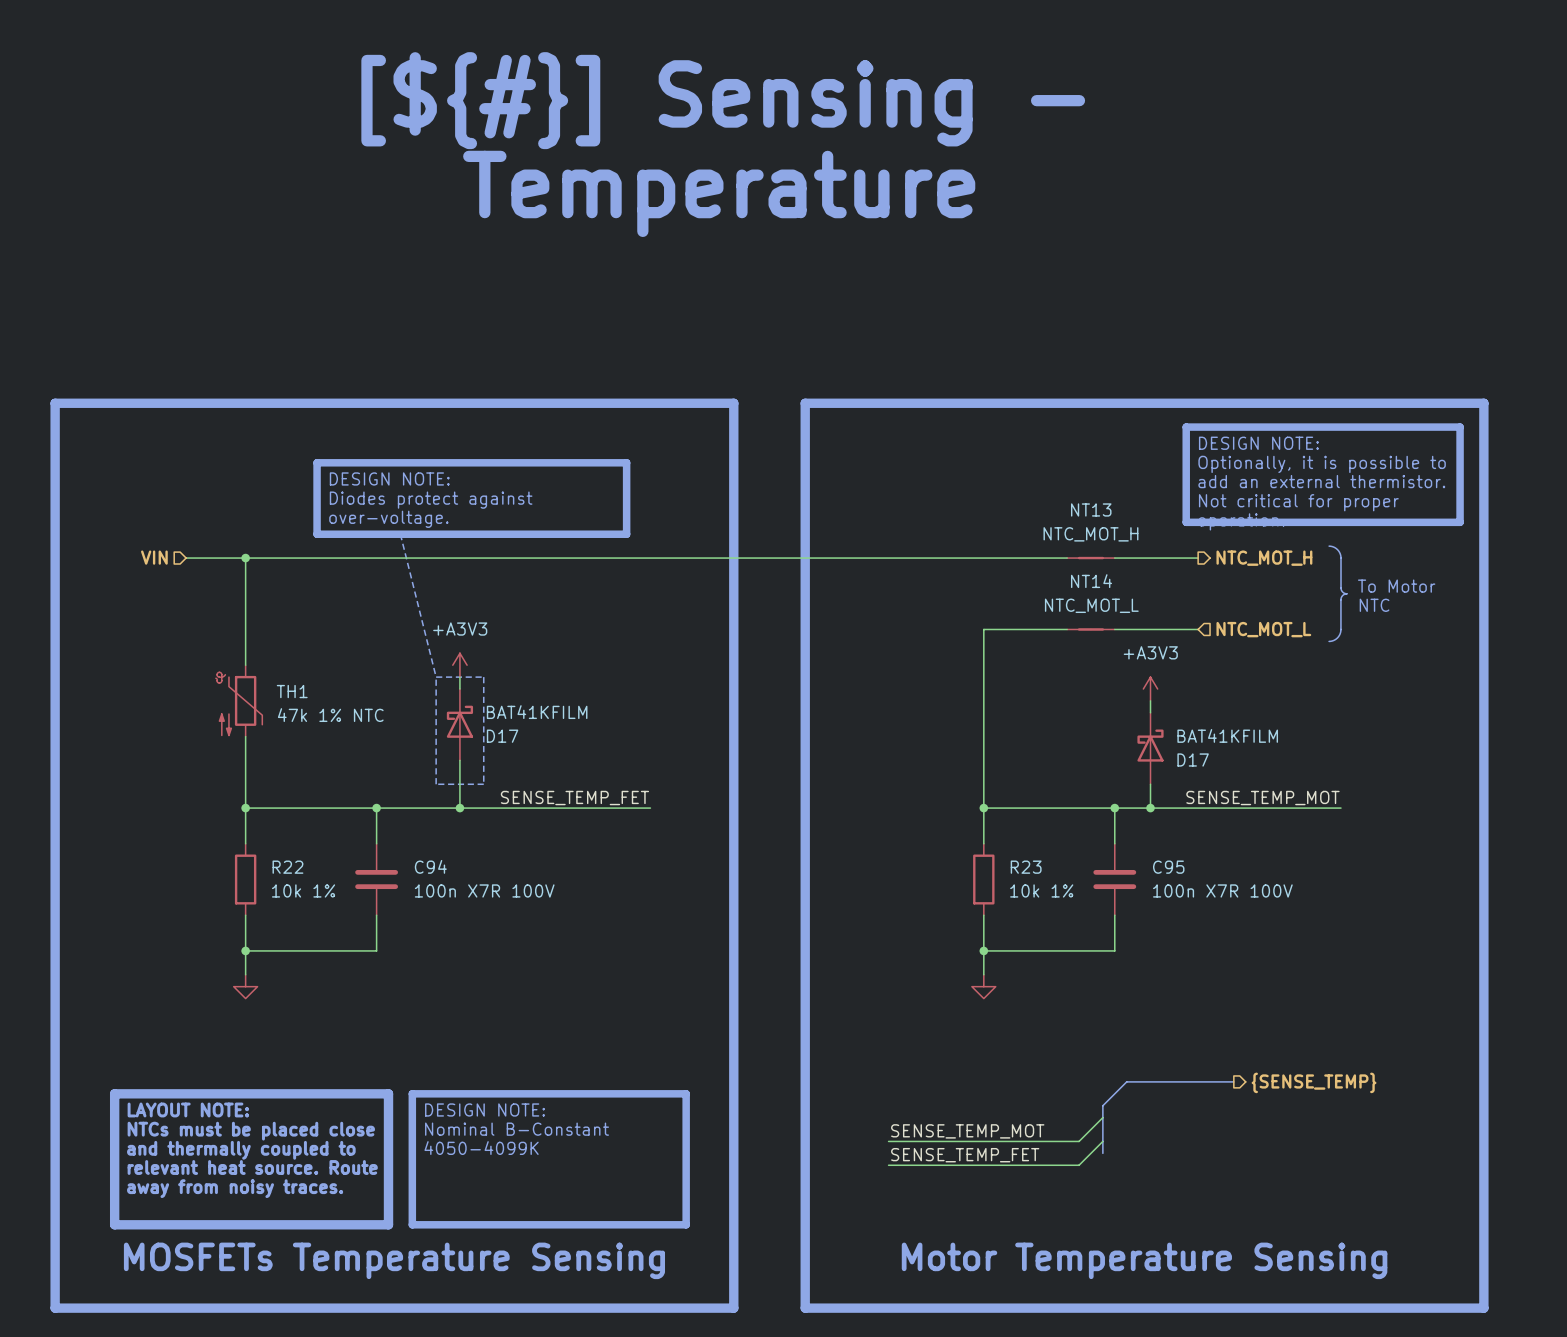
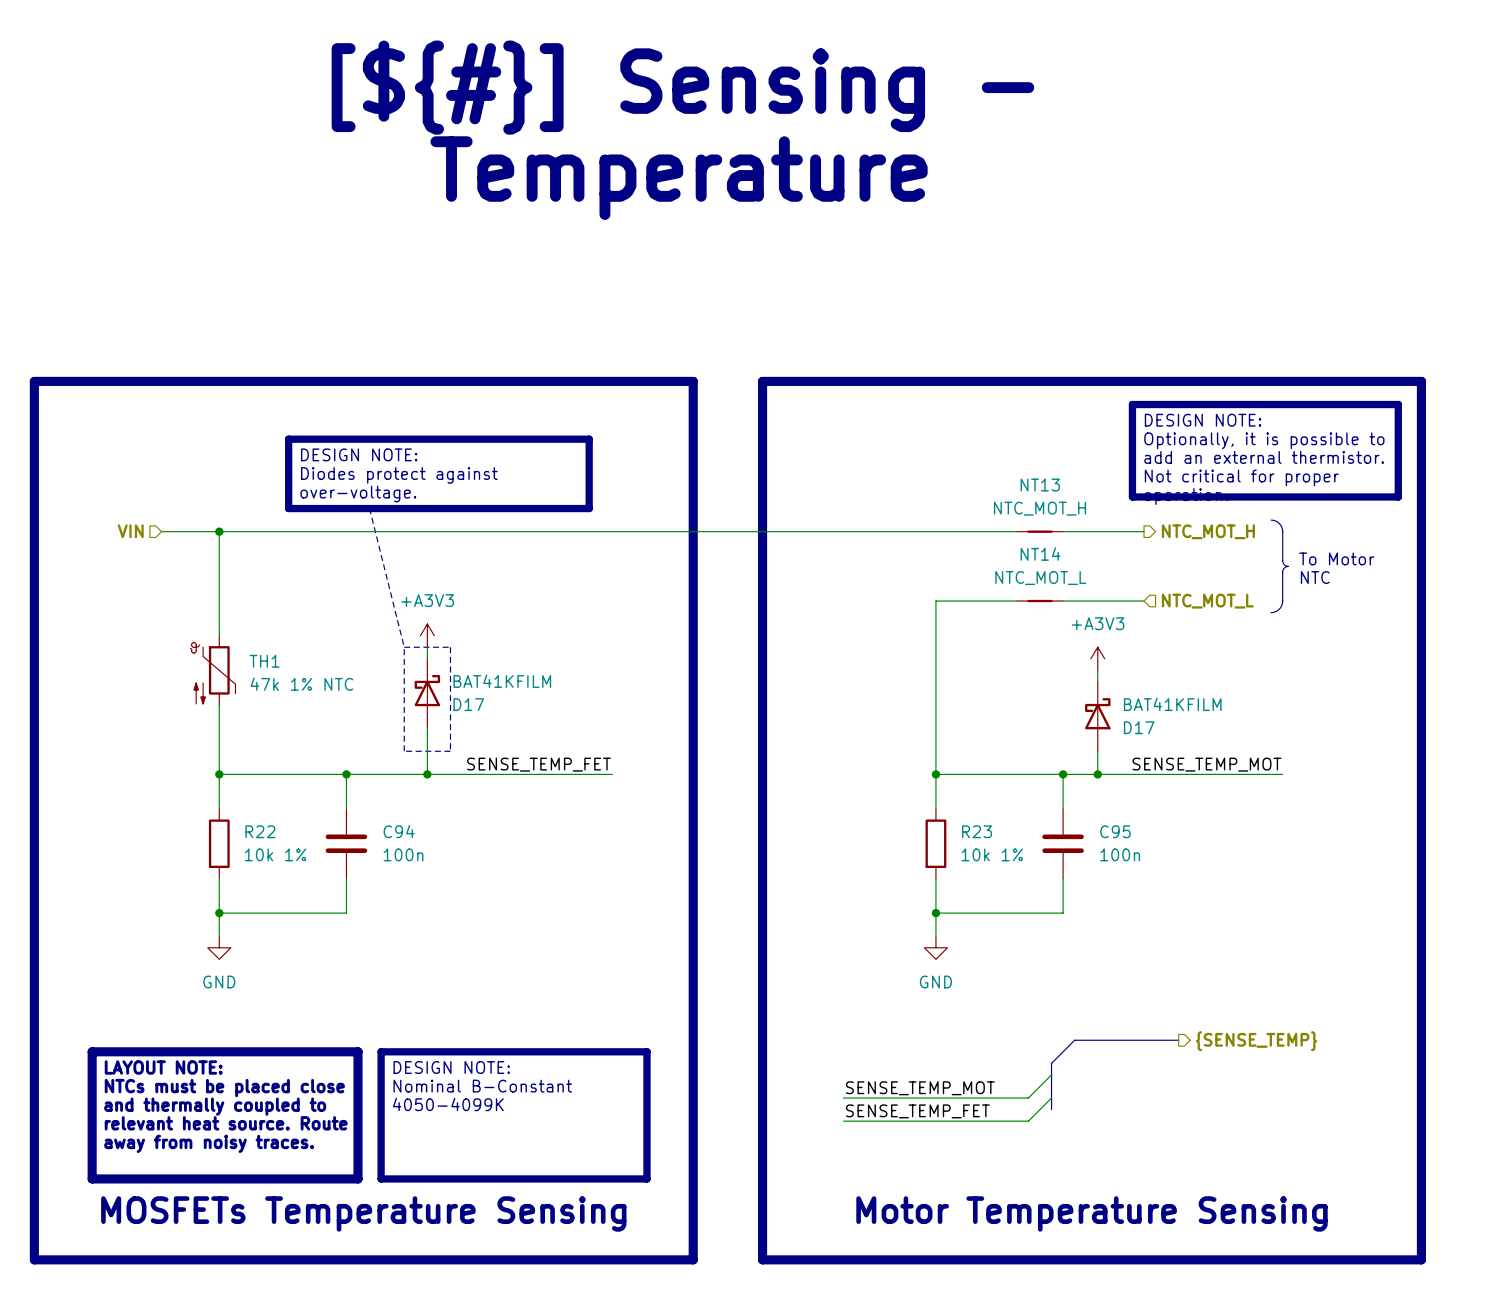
C94 value: 100n X7R 100V (484, 890) -> 100n (403, 854)
C95 value: 100n X7R 100V (1222, 890) -> 100n (1120, 854)
power symbol text: none -> GND (219, 982)
power symbol text: none -> GND (935, 982)

